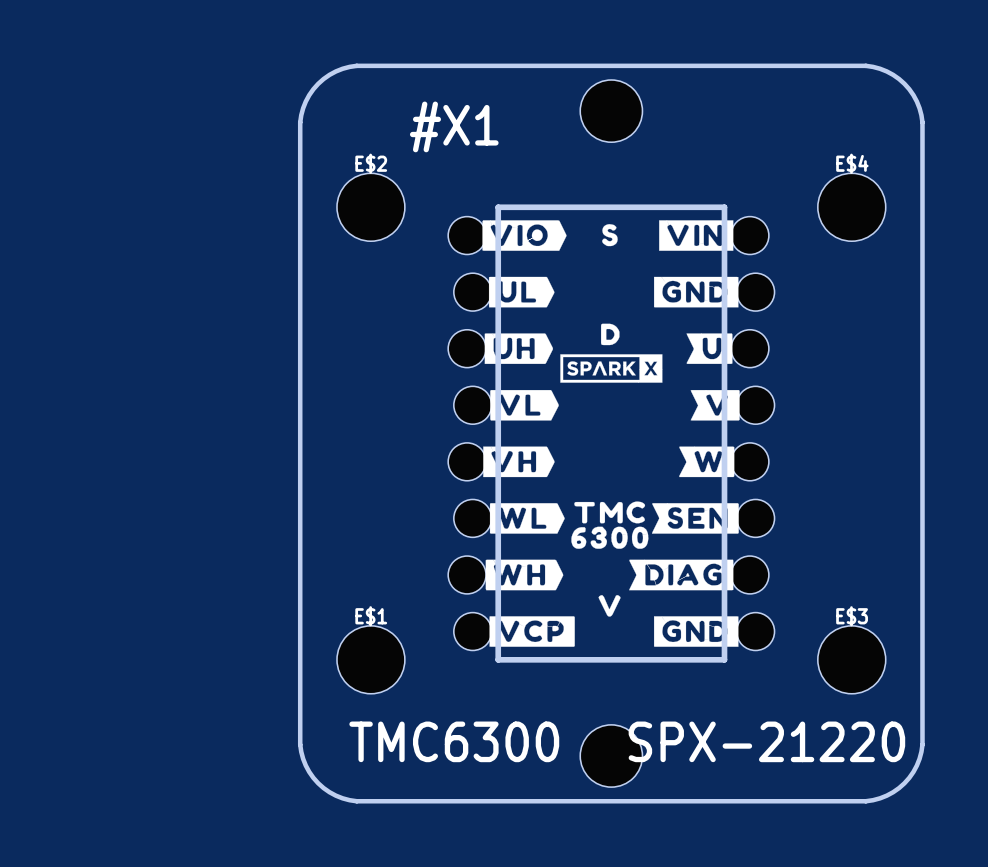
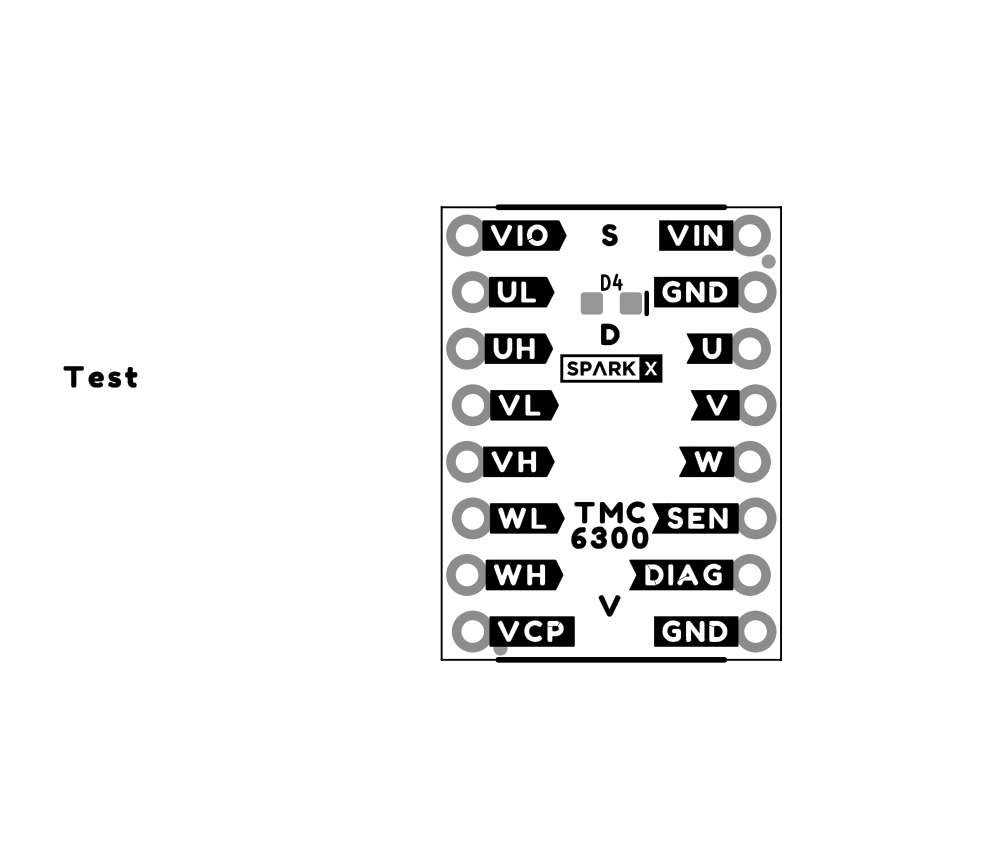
board edge: (356, 65) (865, 65) (880, 68) (893, 74) (909, 89) (919, 108) (922, 122) (922, 744) (919, 758) (913, 771) (899, 788) (880, 798) (865, 801) (356, 801) (342, 798) (329, 792) (313, 777) (303, 758) (300, 744) (300, 122) (305, 101) (318, 83) (335, 71) (356, 65) -> none
part: (611, 111) -> none
text: #X1 (454, 126) -> none
E$2: (370, 207) -> none
board edge: (498, 207) (498, 659) -> (498, 207) (441, 207) (441, 659) (498, 659)
board edge: (724, 207) (724, 659) -> (724, 207) (781, 207) (781, 659) (724, 659)
E$4: (851, 207) -> none
hole: (467, 235) -> none
hole: (749, 235) -> none
part: none -> (768, 261)
hole: (472, 292) -> none
hole: (755, 292) -> none
D4: none -> (614, 303)
hole: (467, 348) -> none
hole: (749, 348) -> none
drawing: none -> [63, 366, 138, 388]
hole: (472, 405) -> none
hole: (755, 405) -> none
part: none -> (469, 433)
part: none -> (752, 433)
hole: (467, 461) -> none
hole: (749, 461) -> none
hole: (472, 518) -> none
hole: (755, 518) -> none
hole: (467, 574) -> none
hole: (749, 574) -> none
hole: (472, 631) -> none
hole: (755, 631) -> none
part: none -> (500, 648)
E$1: (370, 659) -> none
E$3: (851, 659) -> none
text: TMC6300 (454, 741) -> none
text: SPX-21220 (766, 741) -> none
part: (611, 756) -> none

